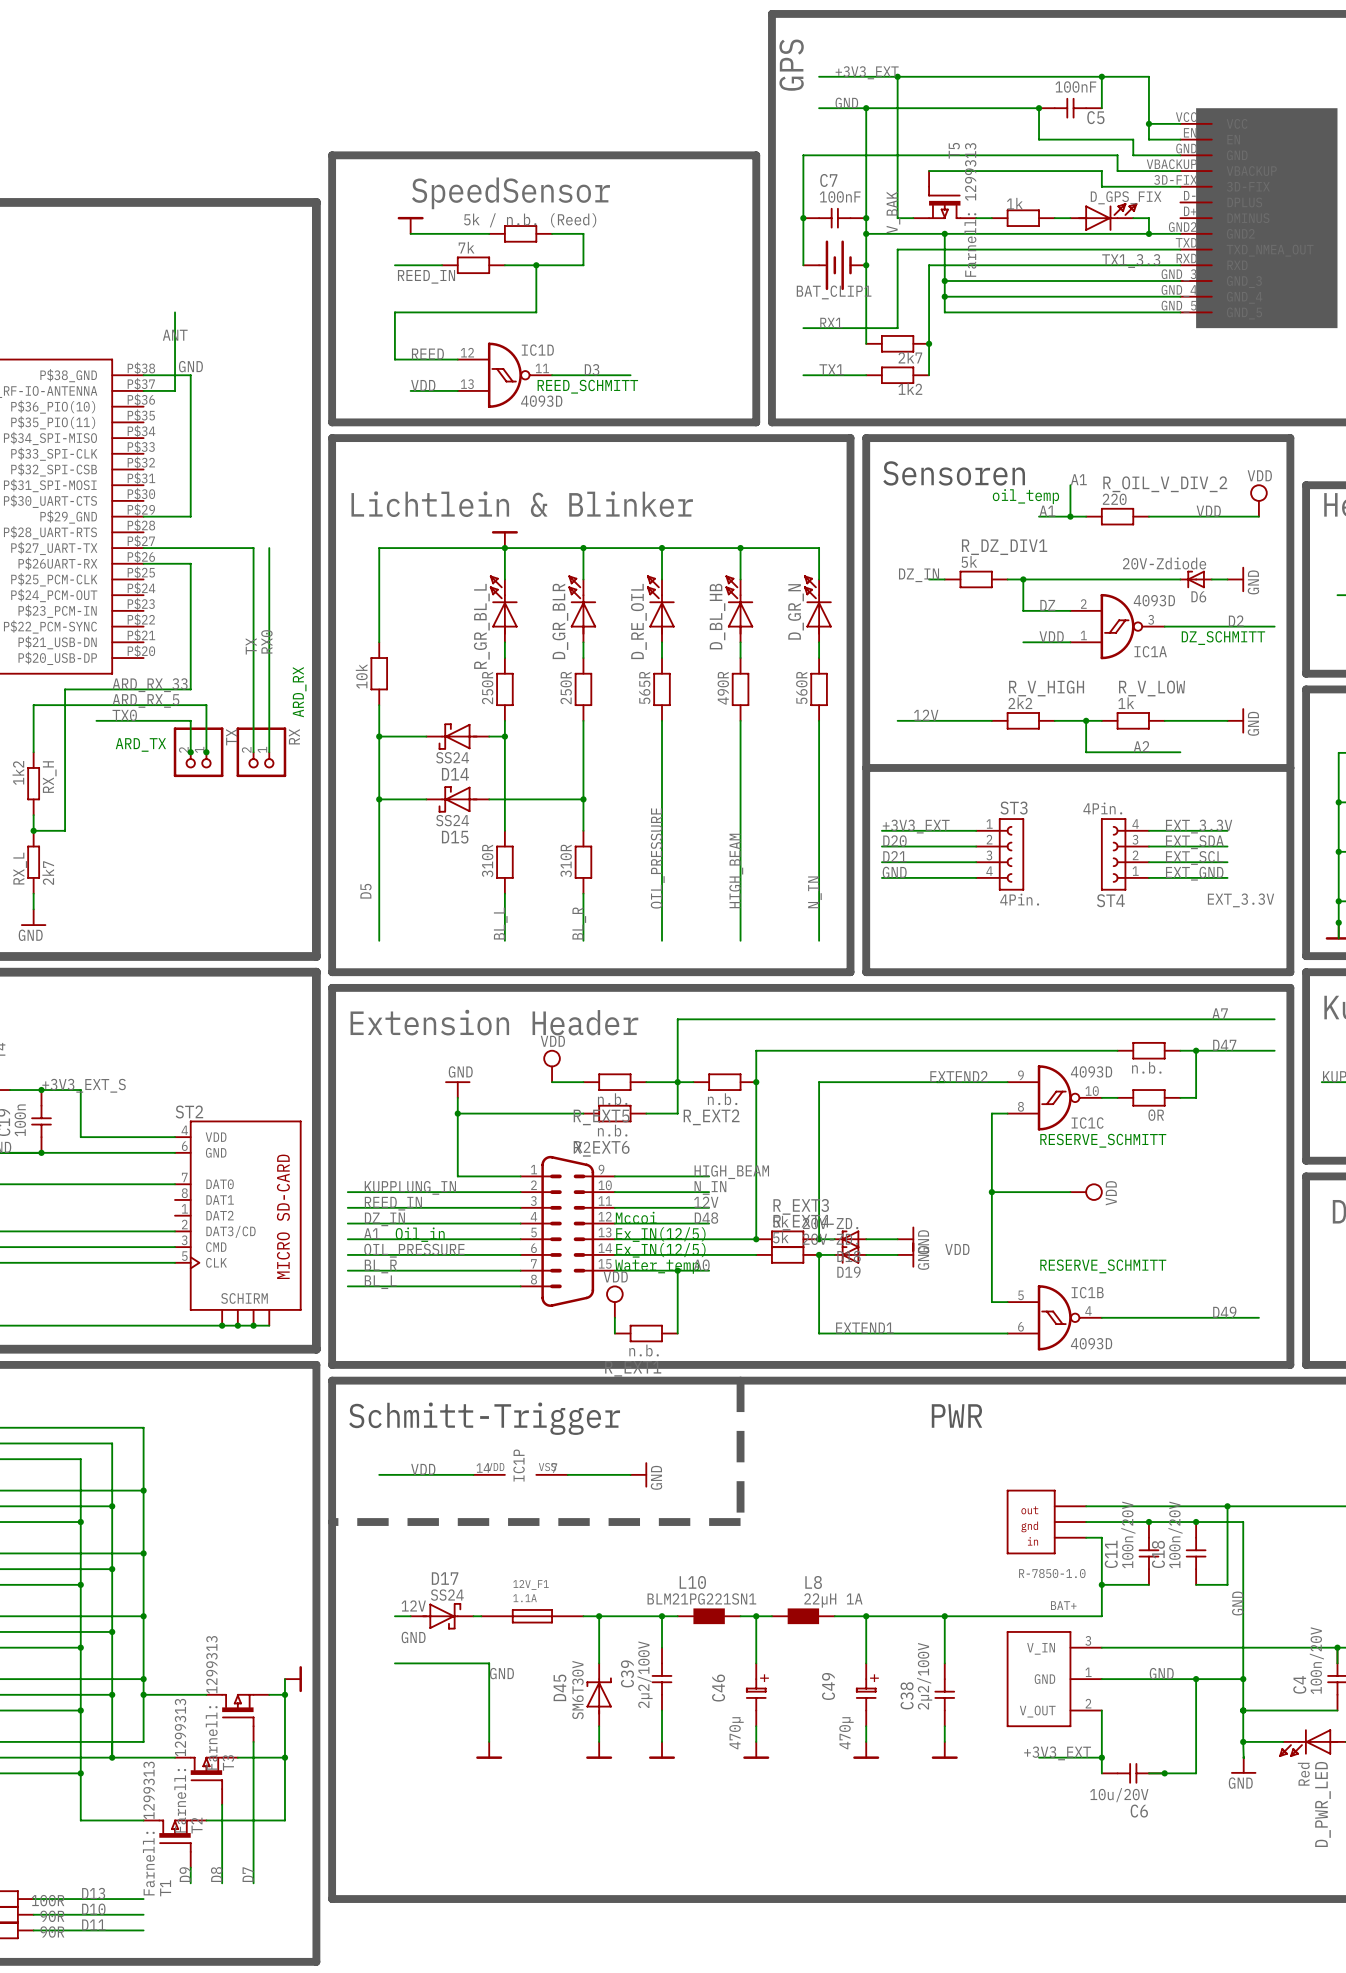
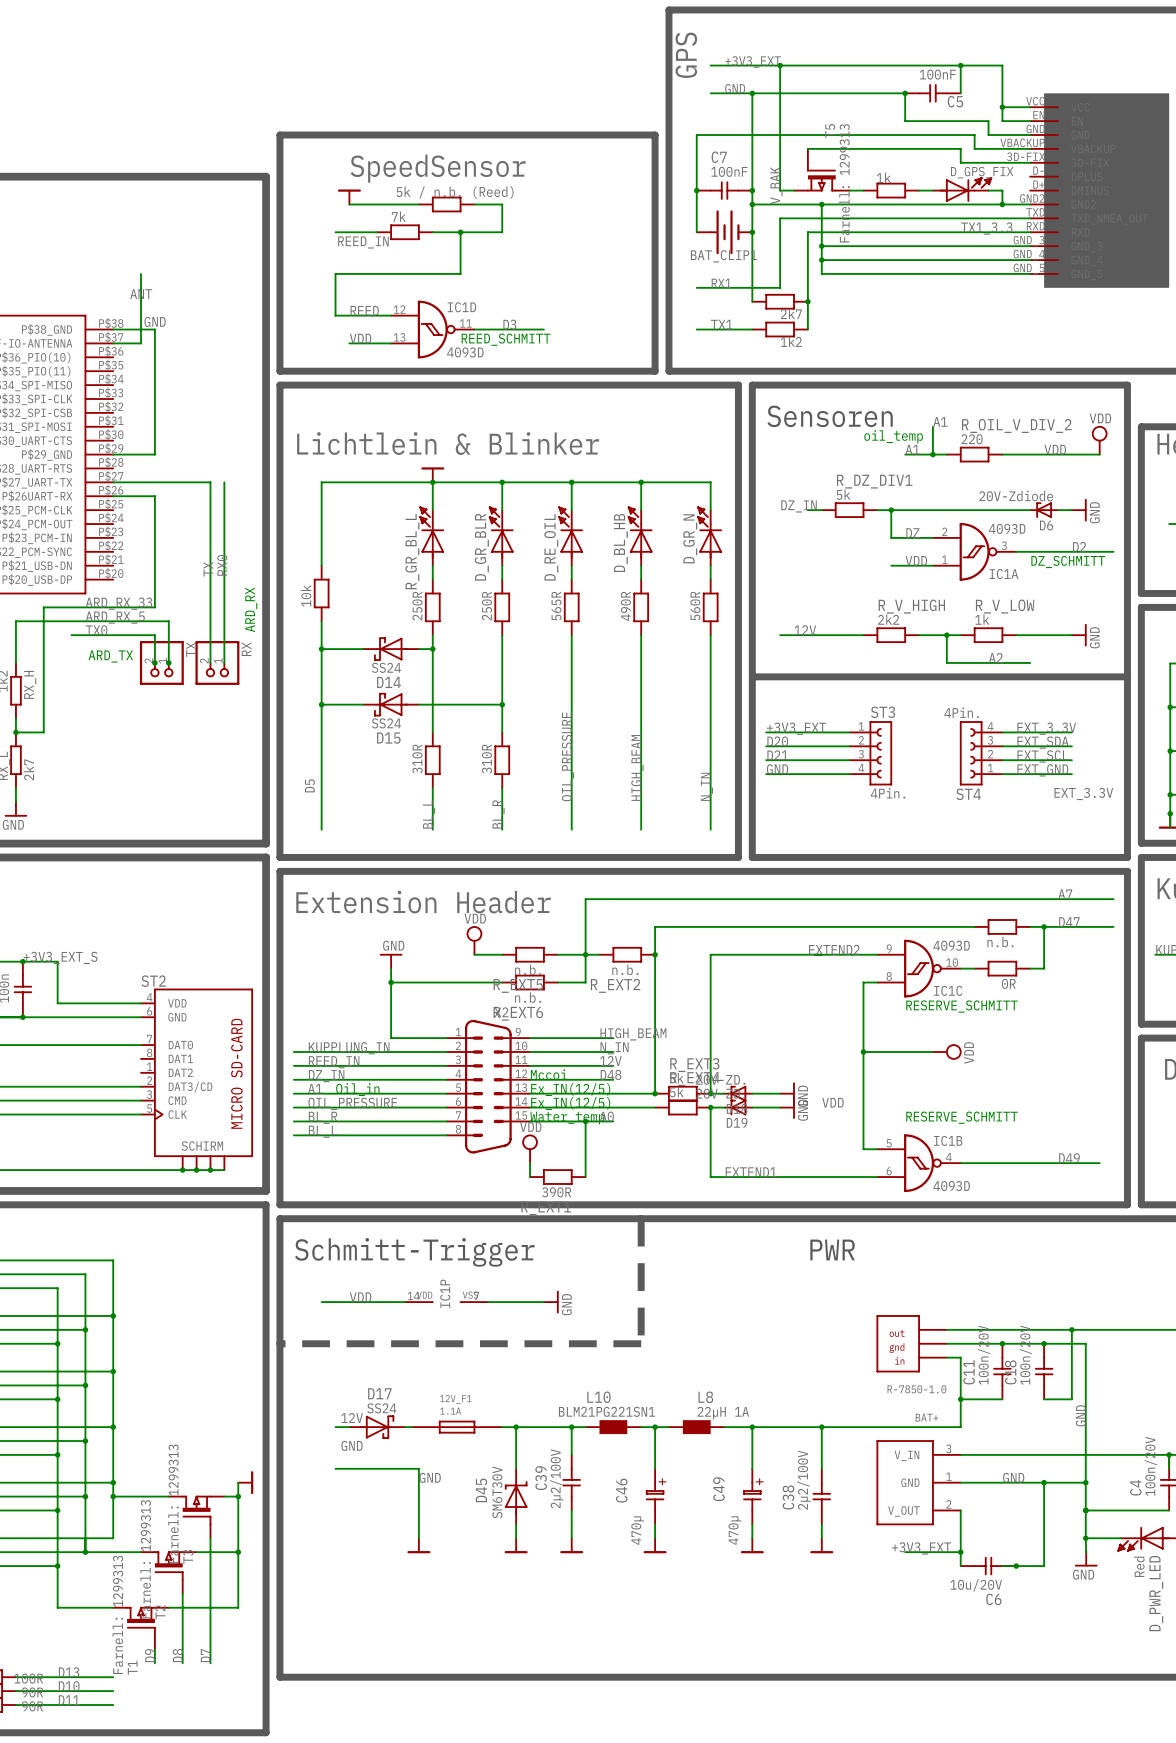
part value: n.b. (644, 1350) -> 390R (556, 1192)

